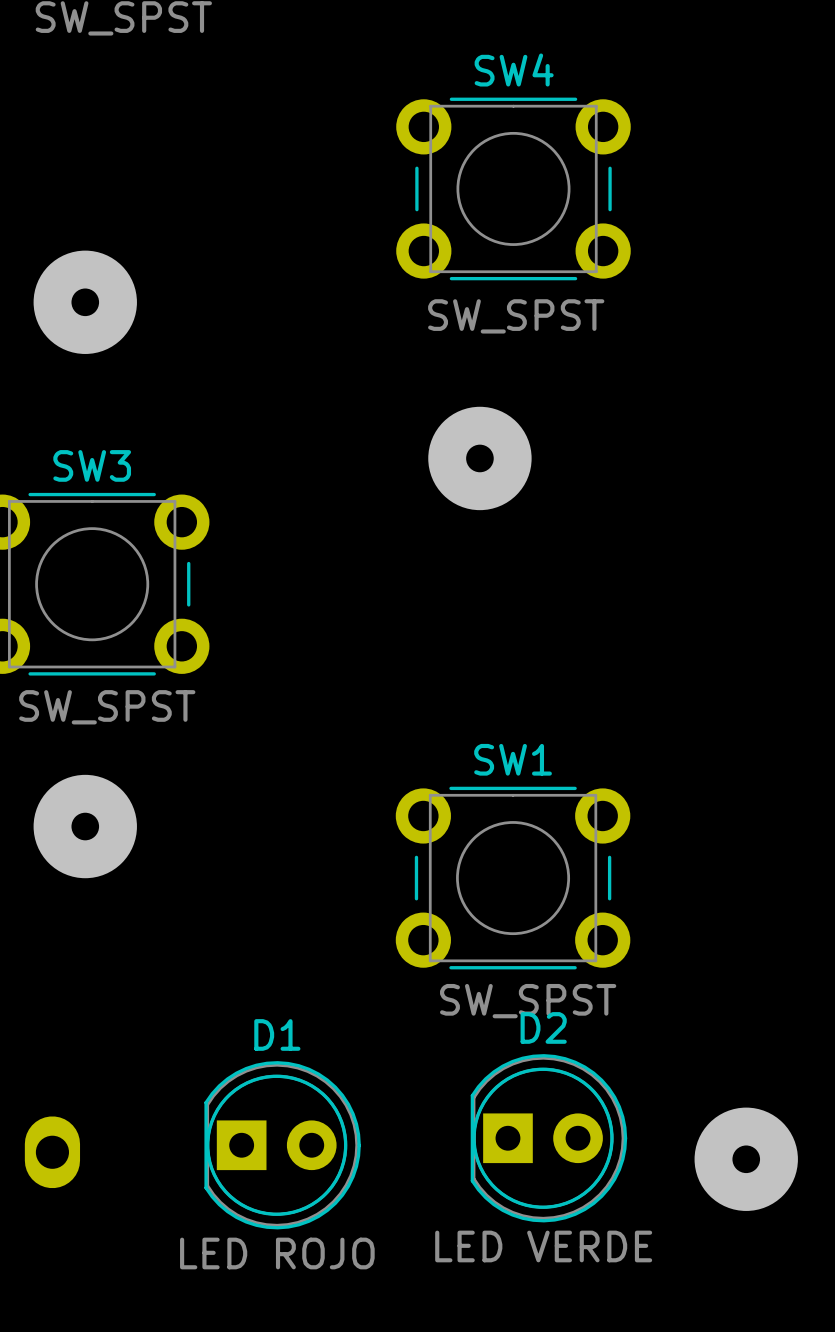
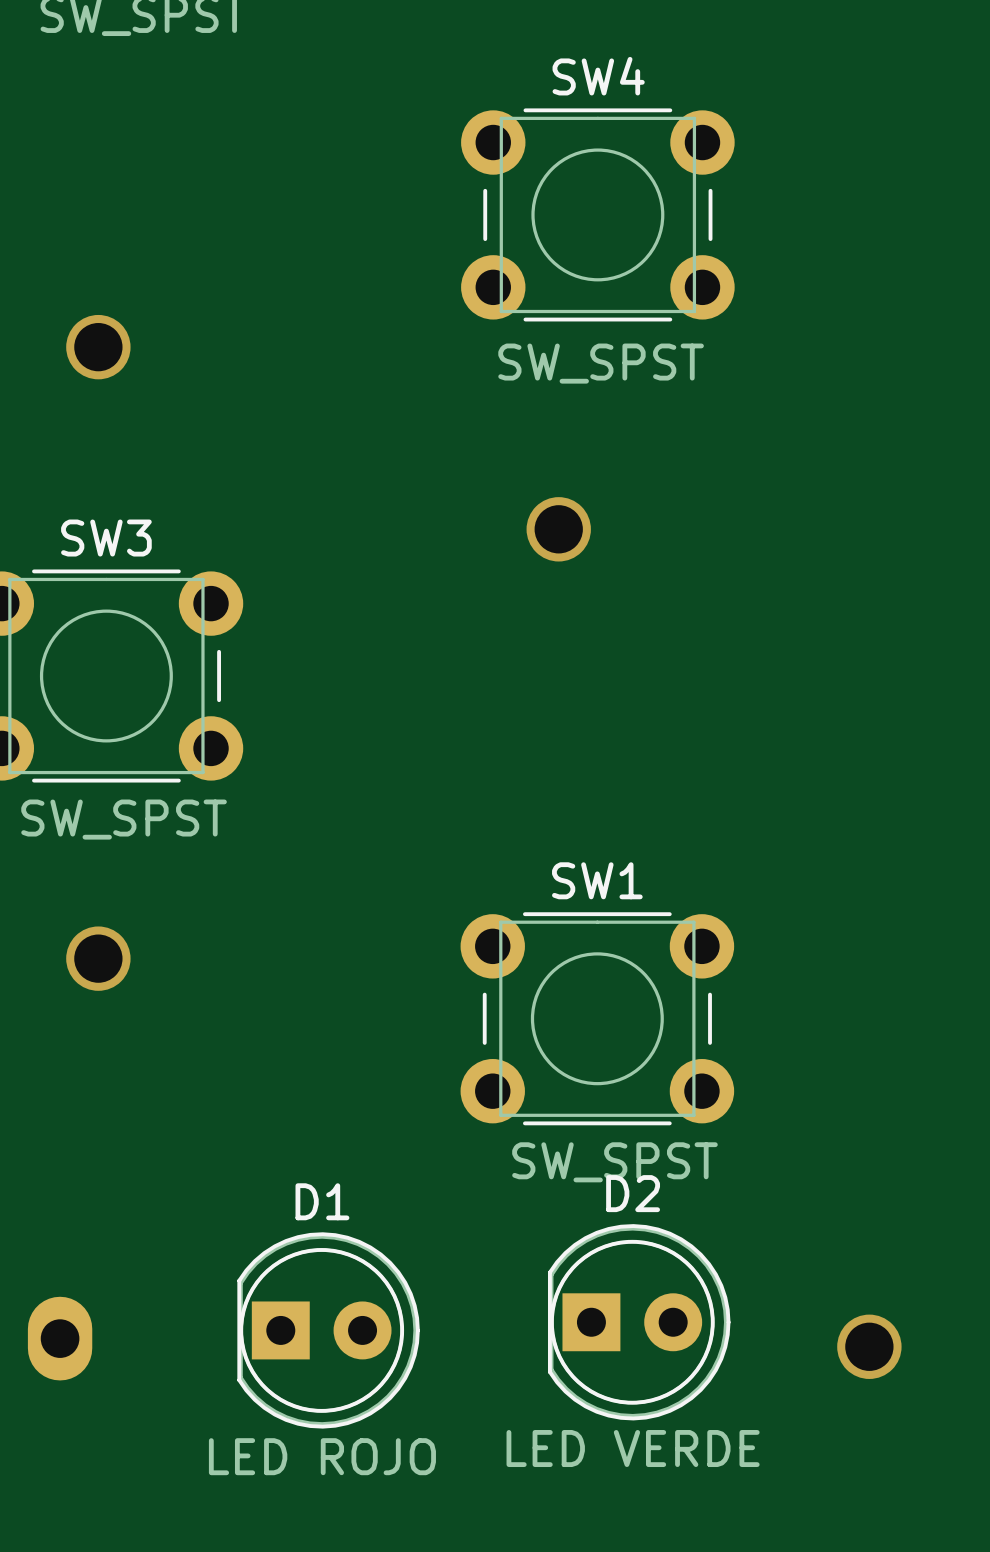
via size: [33, 250, 137, 354] -> [66, 314, 131, 380]
via size: [428, 406, 532, 511] -> [526, 497, 591, 562]
via size: [33, 774, 137, 879] -> [66, 926, 131, 991]
via size: [694, 1107, 798, 1211] -> [837, 1314, 902, 1379]

